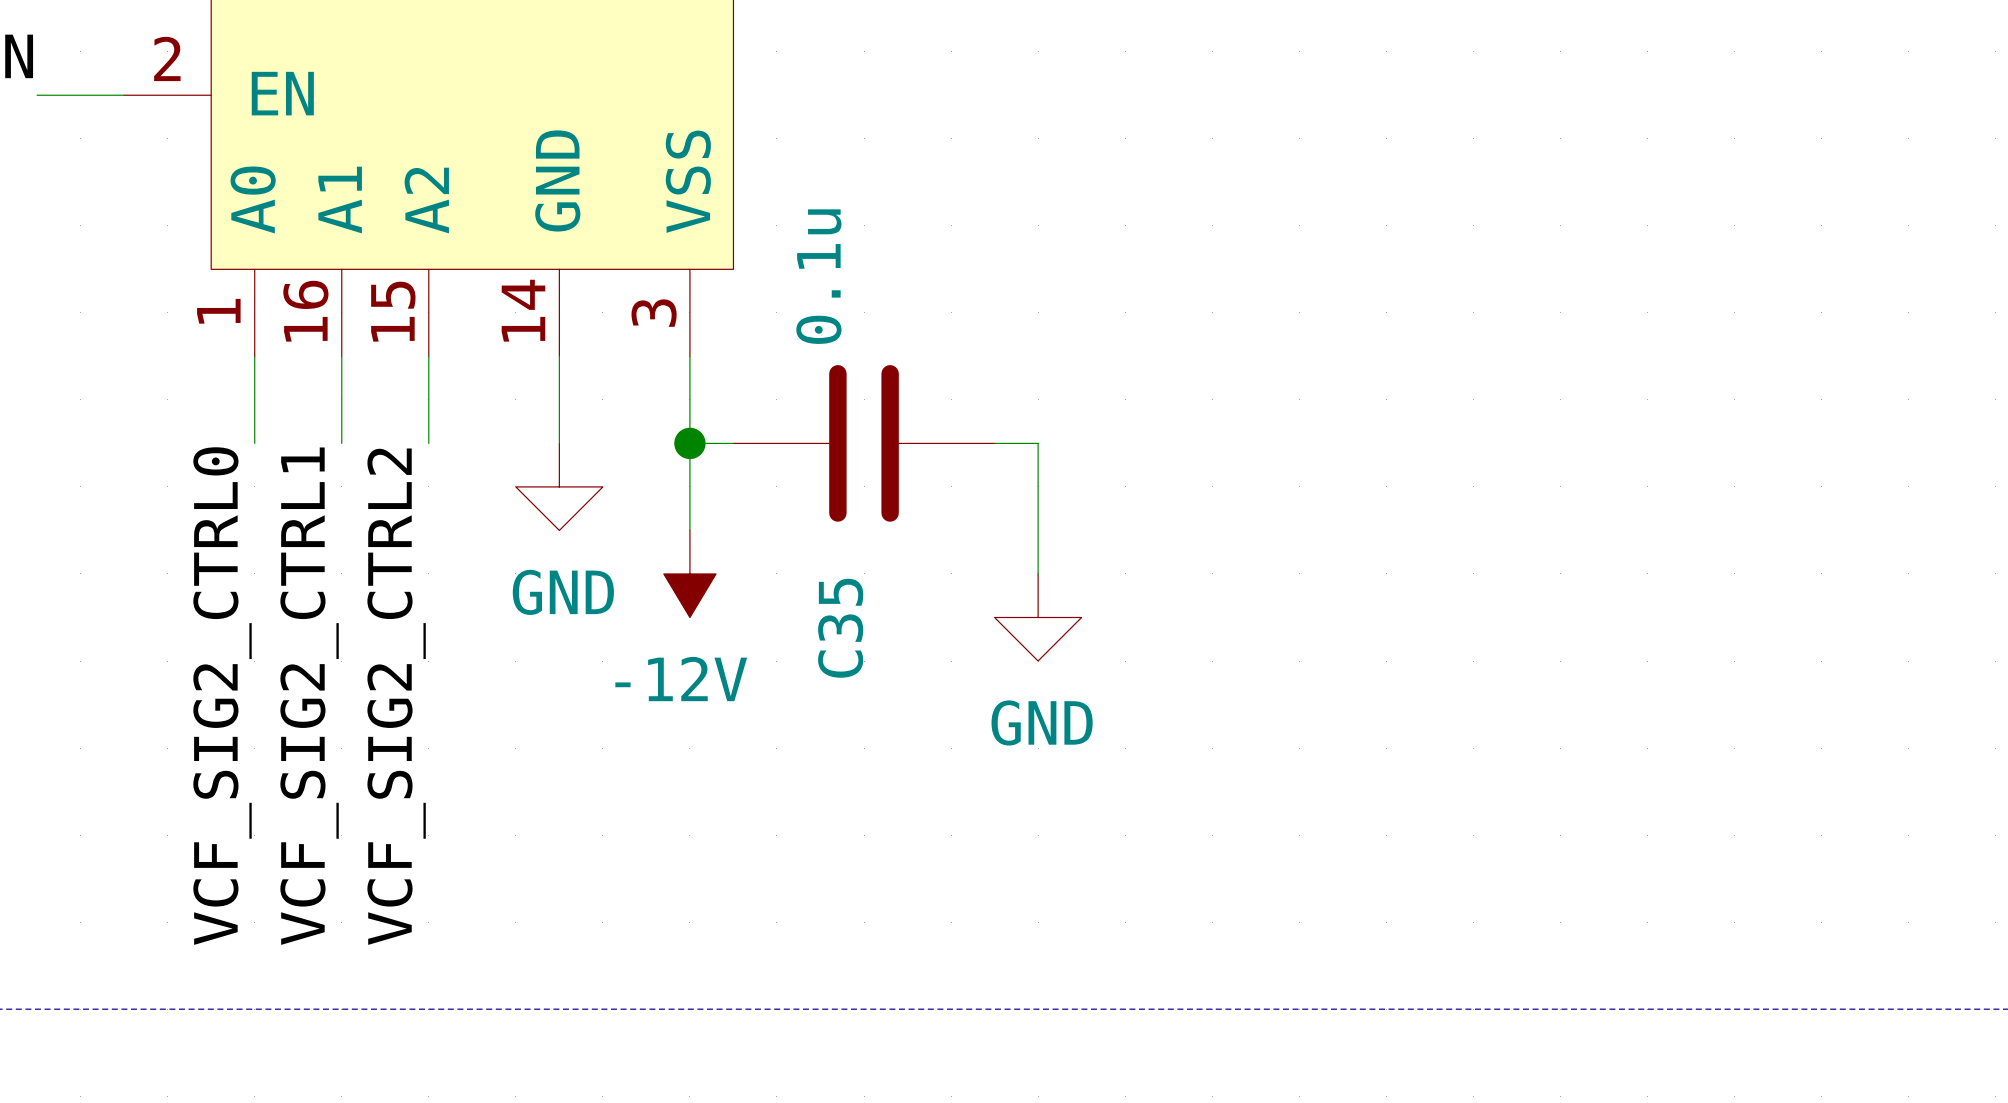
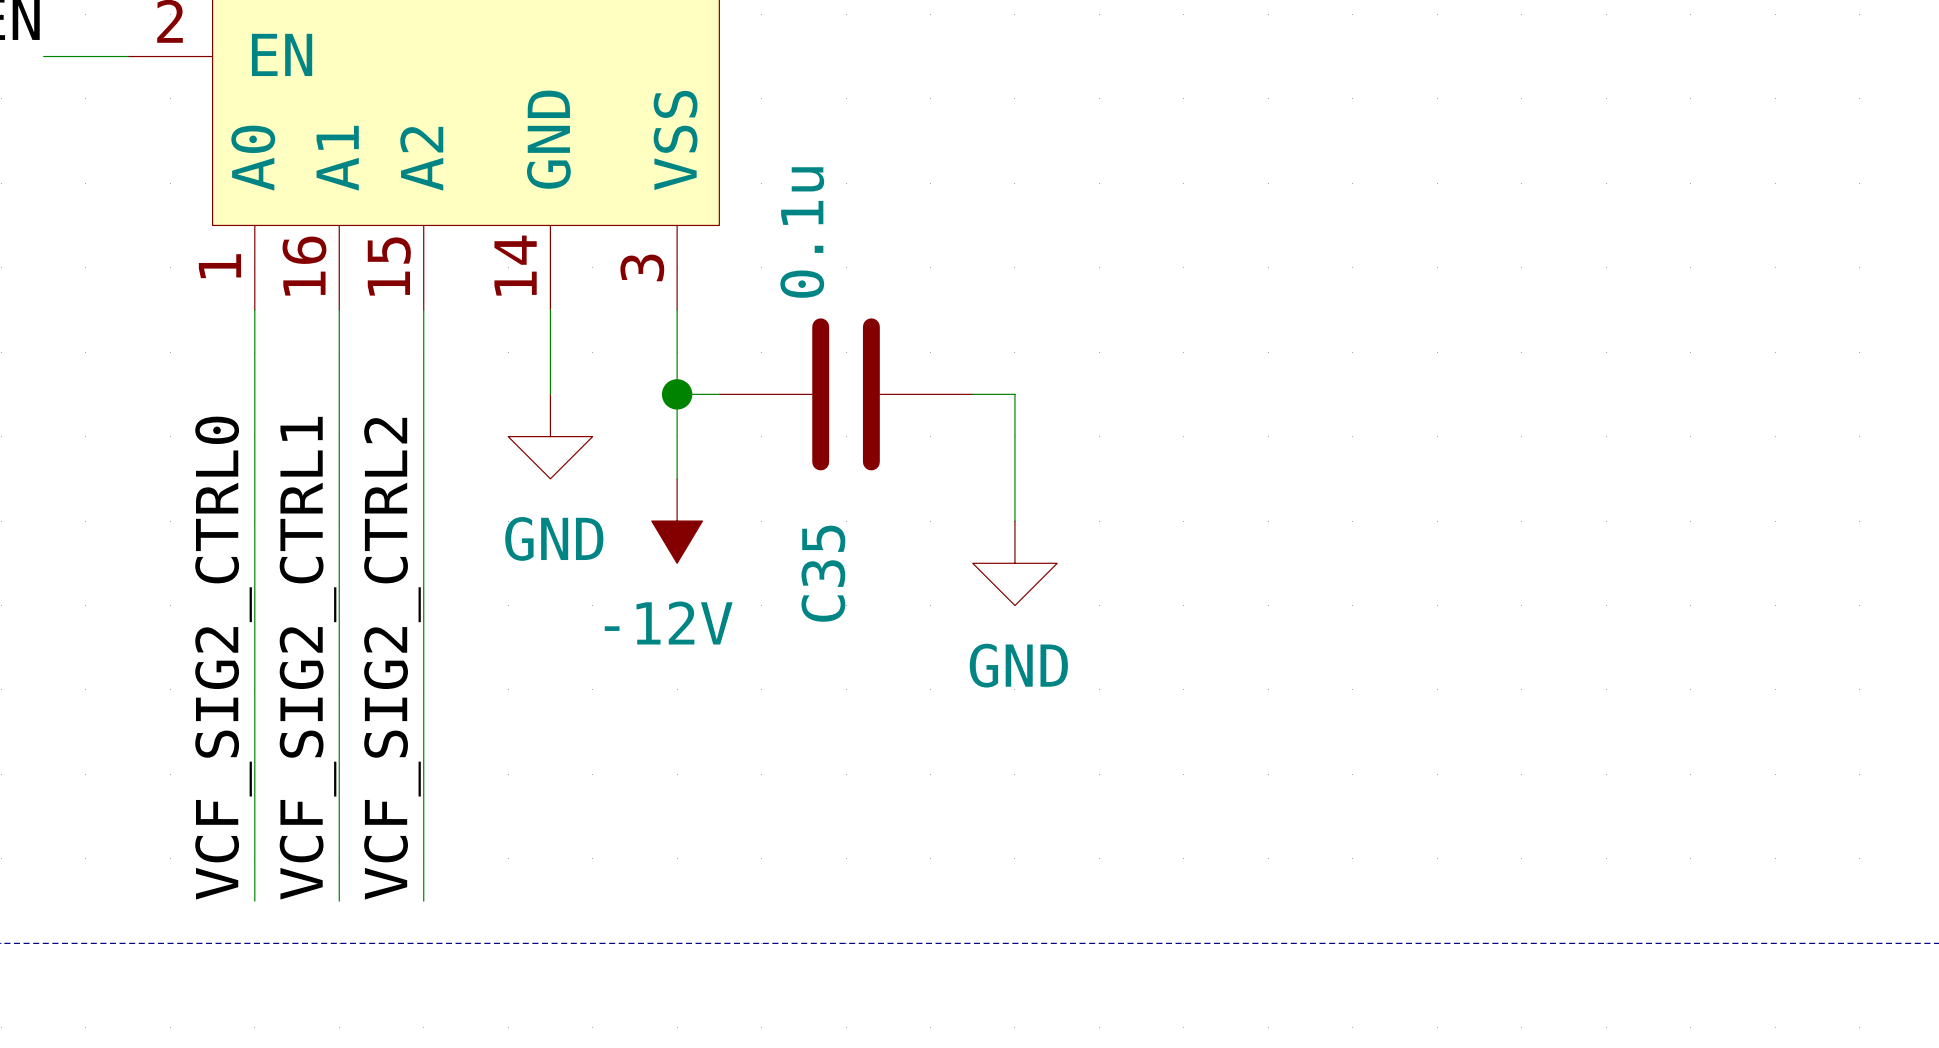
wire: none -> (254, 394) (254, 901)
wire: none -> (339, 394) (339, 901)
wire: none -> (423, 394) (423, 901)
label position: VCF_SIG2_CTRL0 (222, 696) -> VCF_SIG2_CTRL0 (223, 658)
label position: VCF_SIG2_CTRL1 (309, 696) -> VCF_SIG2_CTRL1 (308, 658)
label position: VCF_SIG2_CTRL2 (396, 696) -> VCF_SIG2_CTRL2 (392, 658)

